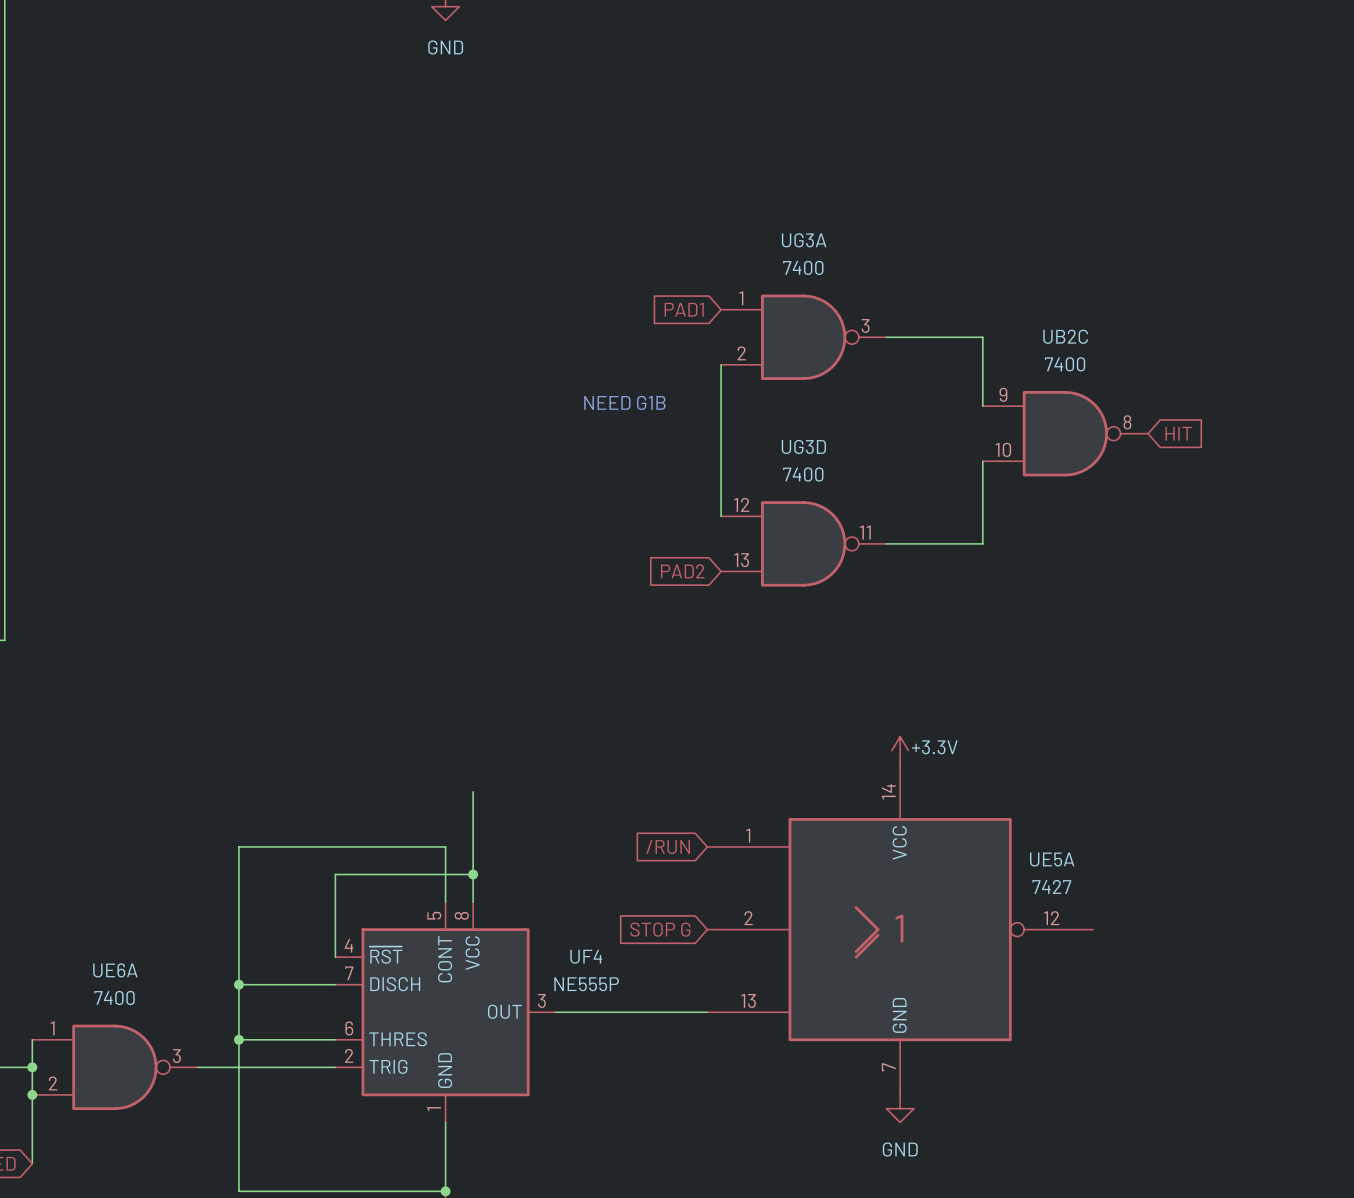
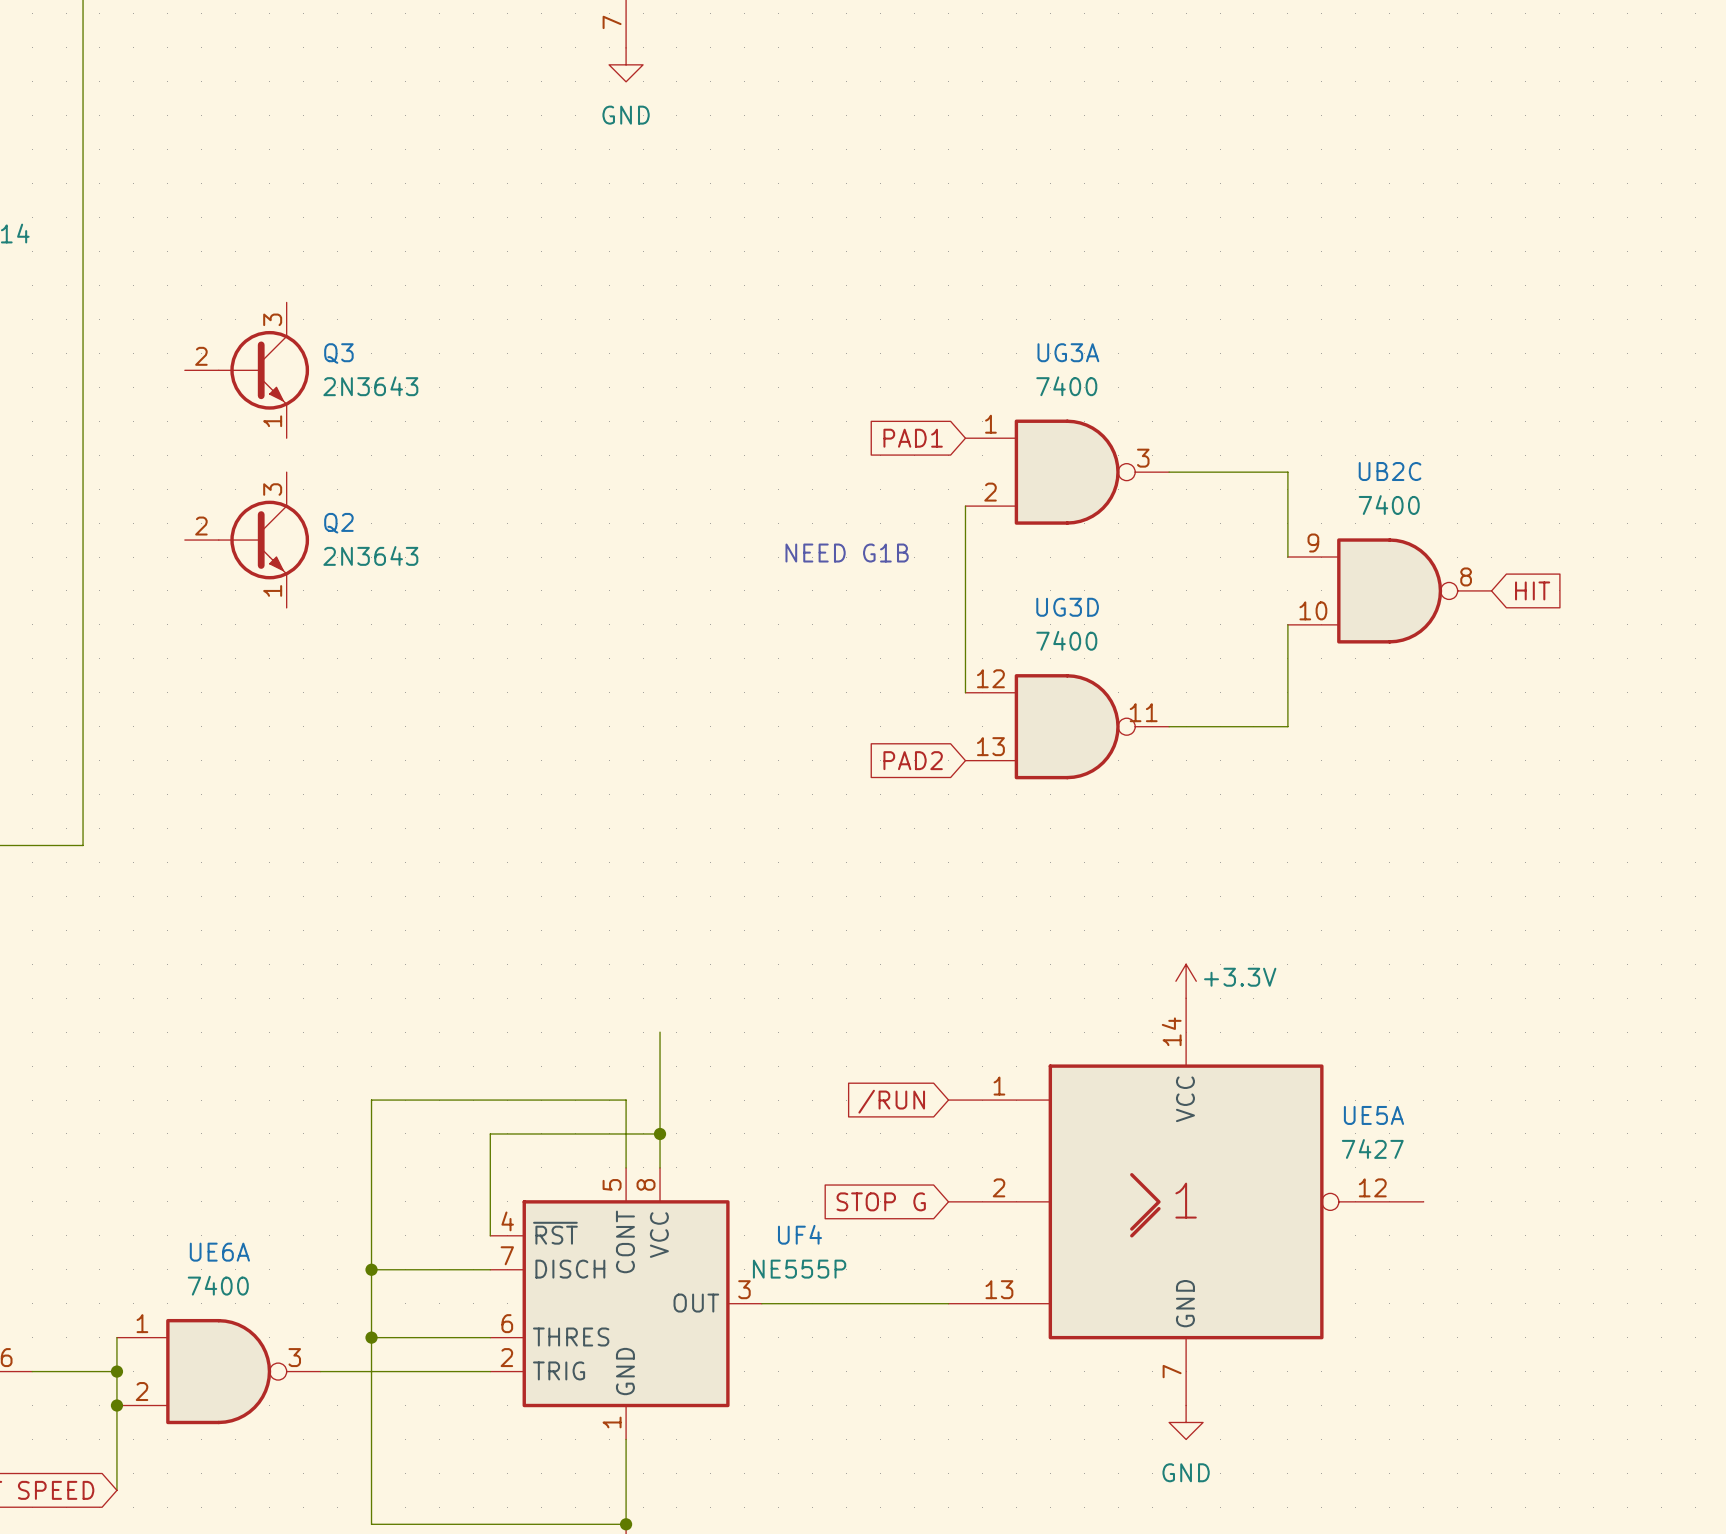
Q3: none -> 2N3643 (246, 370)
Q2: none -> 2N3643 (246, 540)

